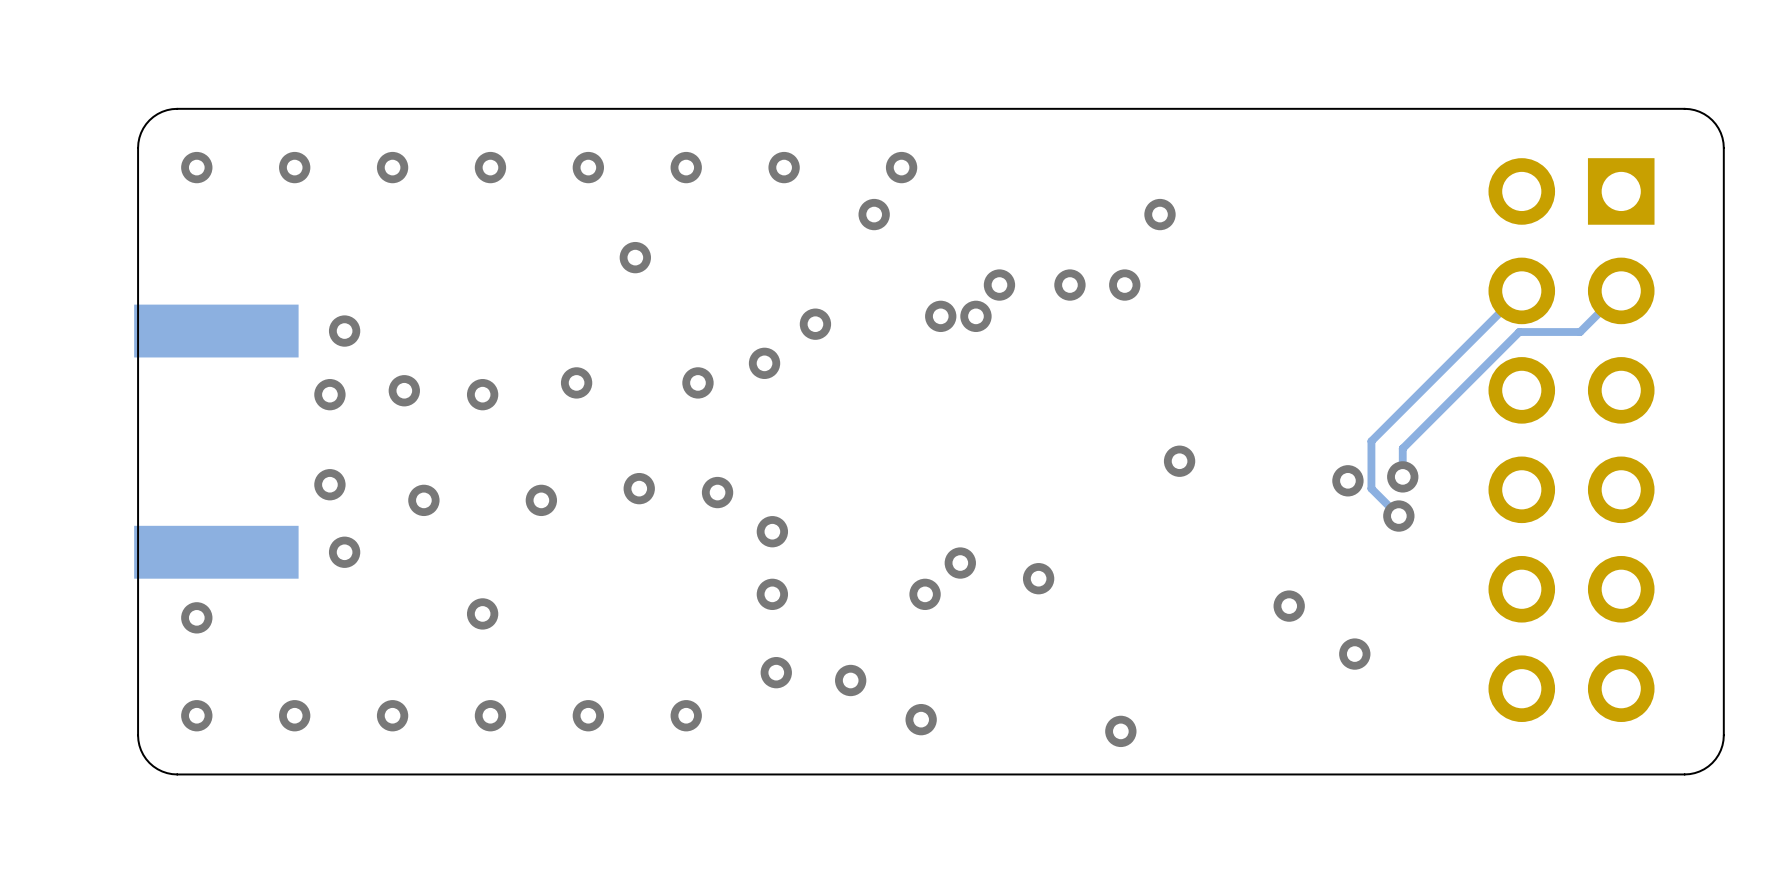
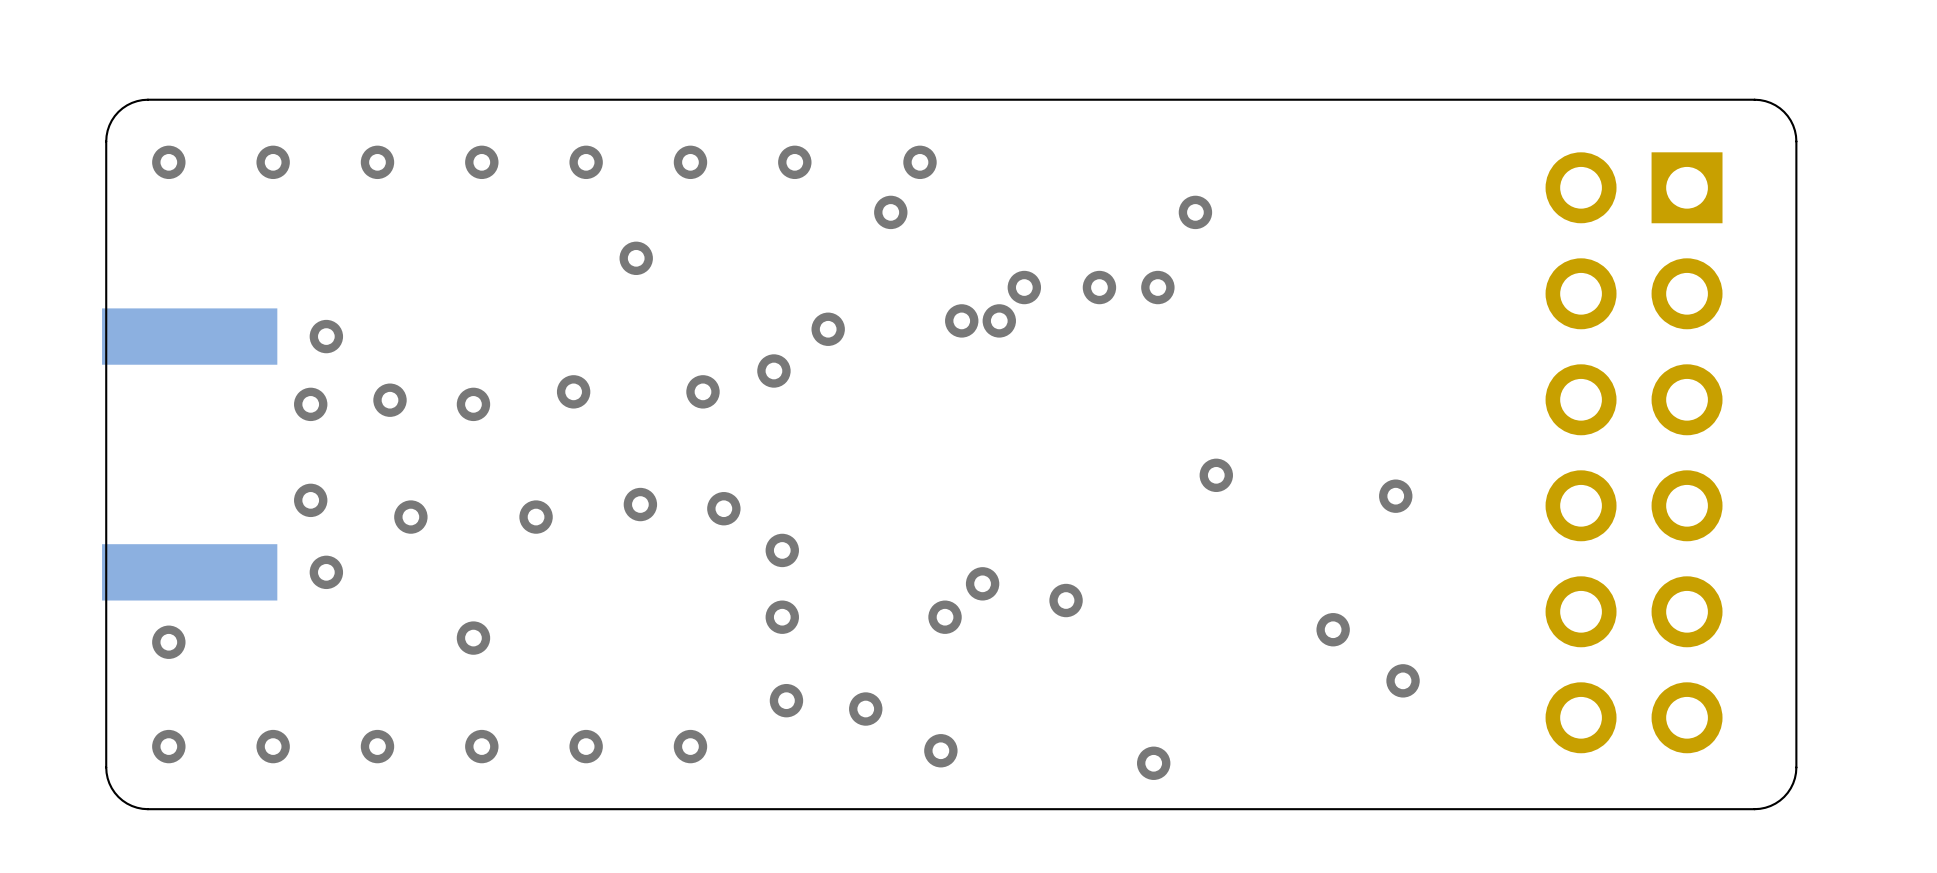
track: (1521, 290) (1371, 441) (1371, 488) (1398, 516) -> none
track: (1621, 290) (1580, 332) (1519, 332) (1402, 448) (1402, 476) -> none
via: (1402, 476) -> none
via: (1398, 516) -> none

